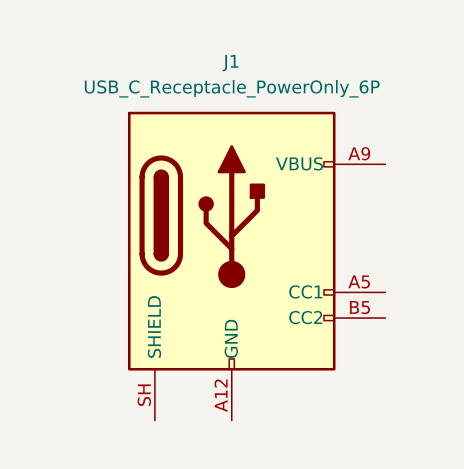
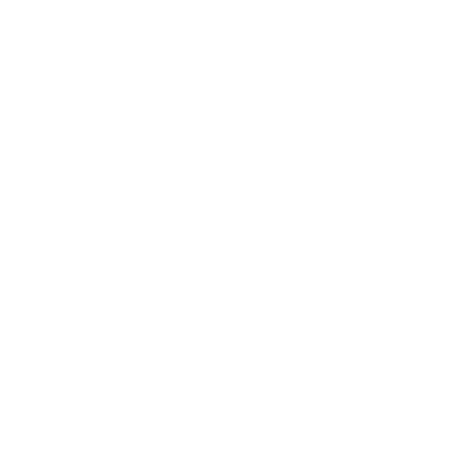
J1: USB_C_Receptacle_PowerOnly_6P (256, 266) -> none

